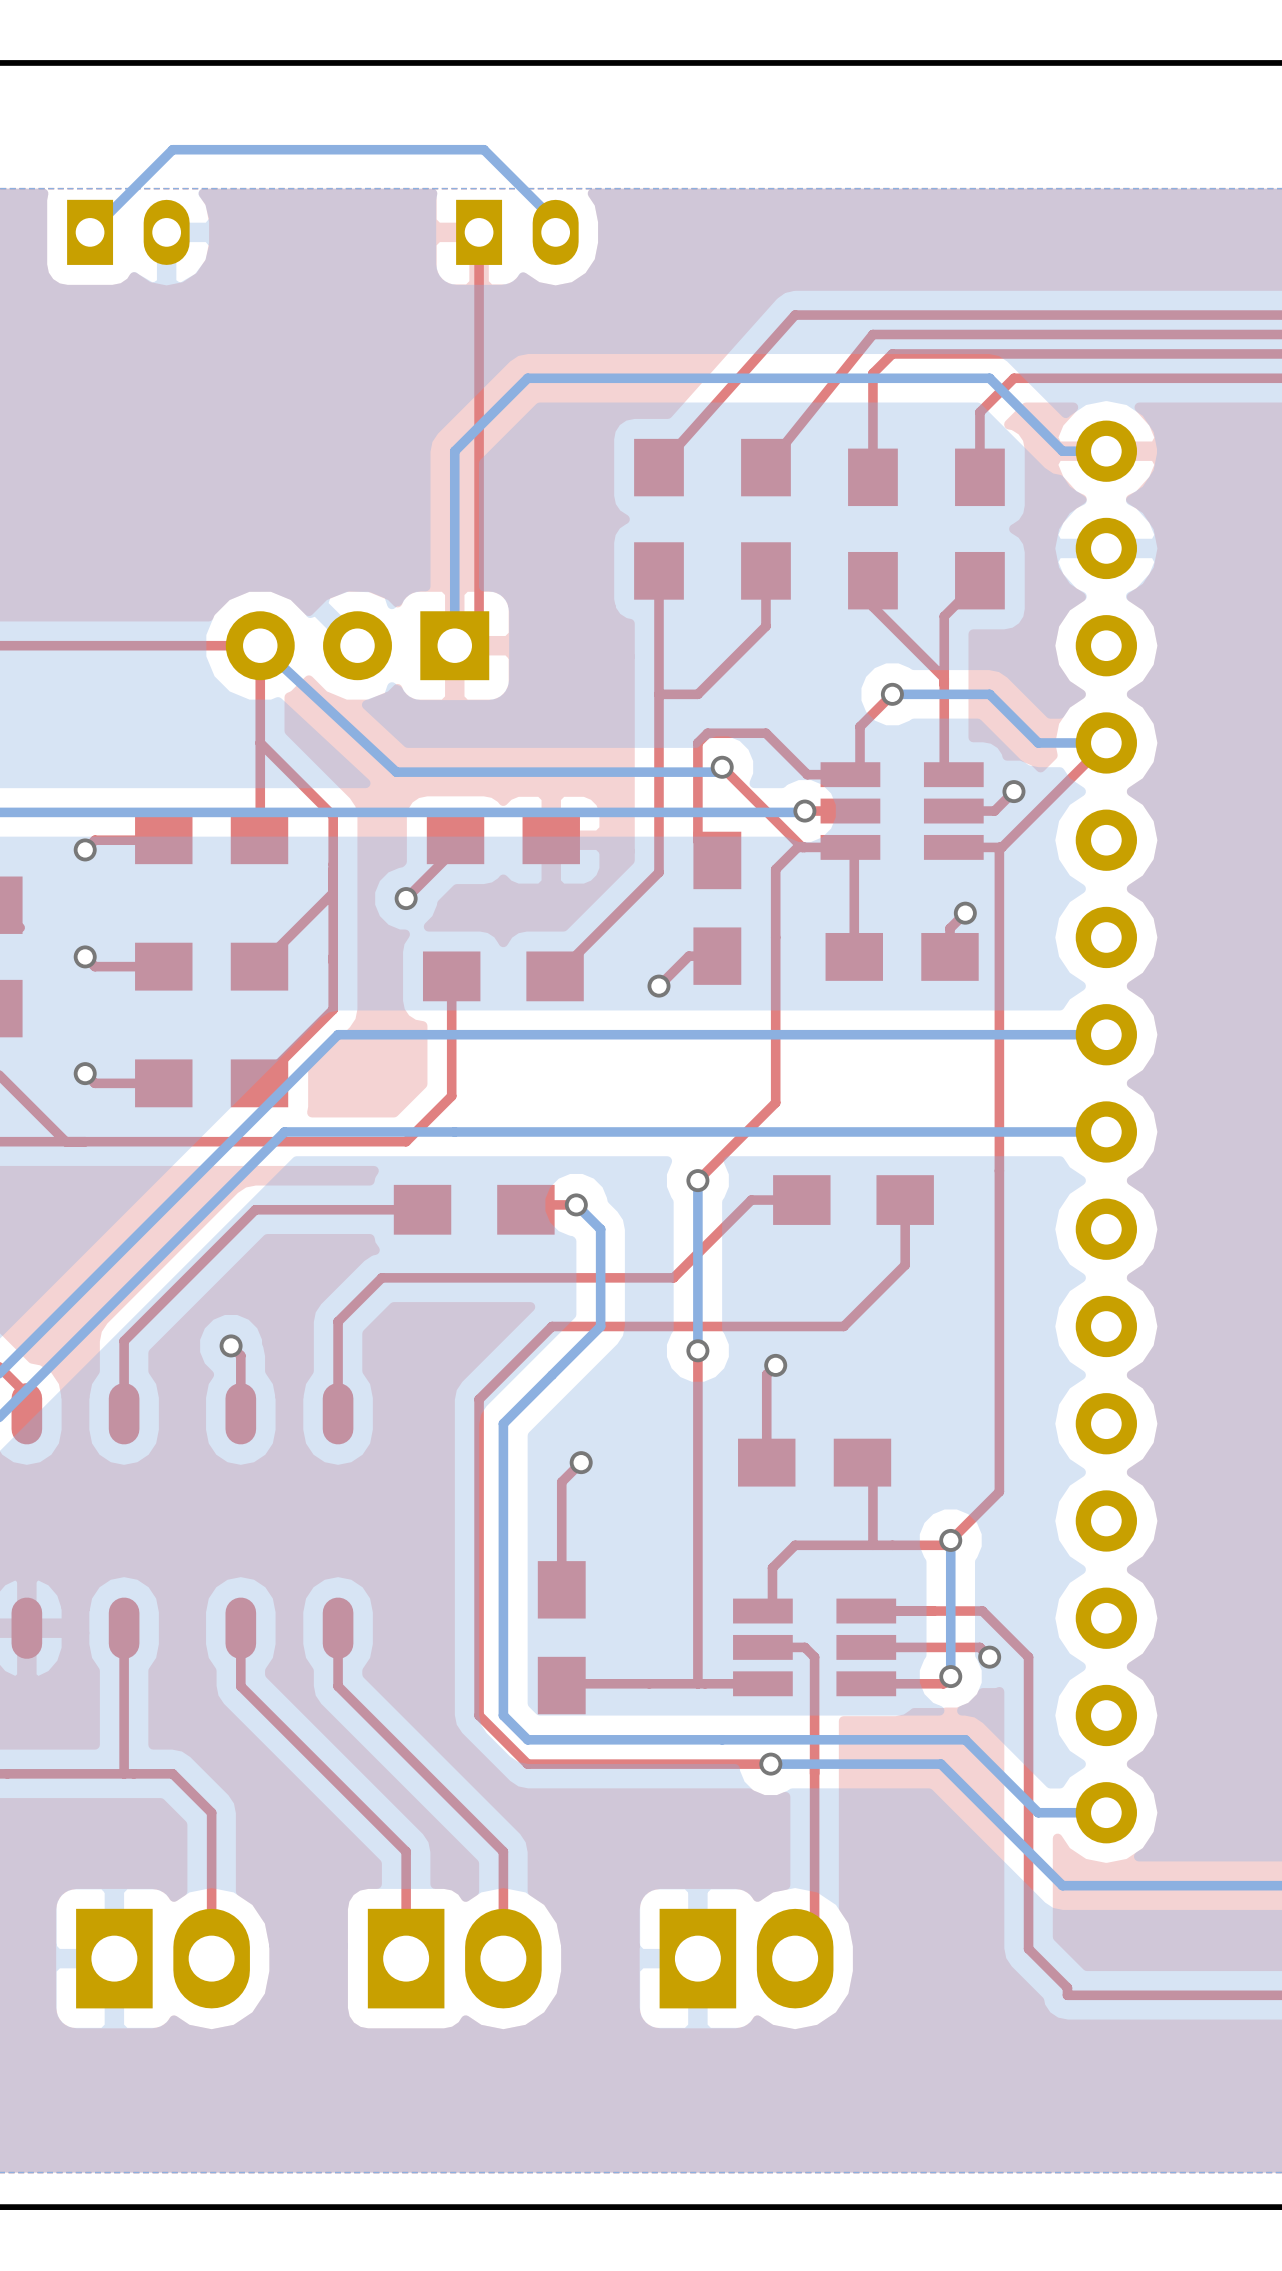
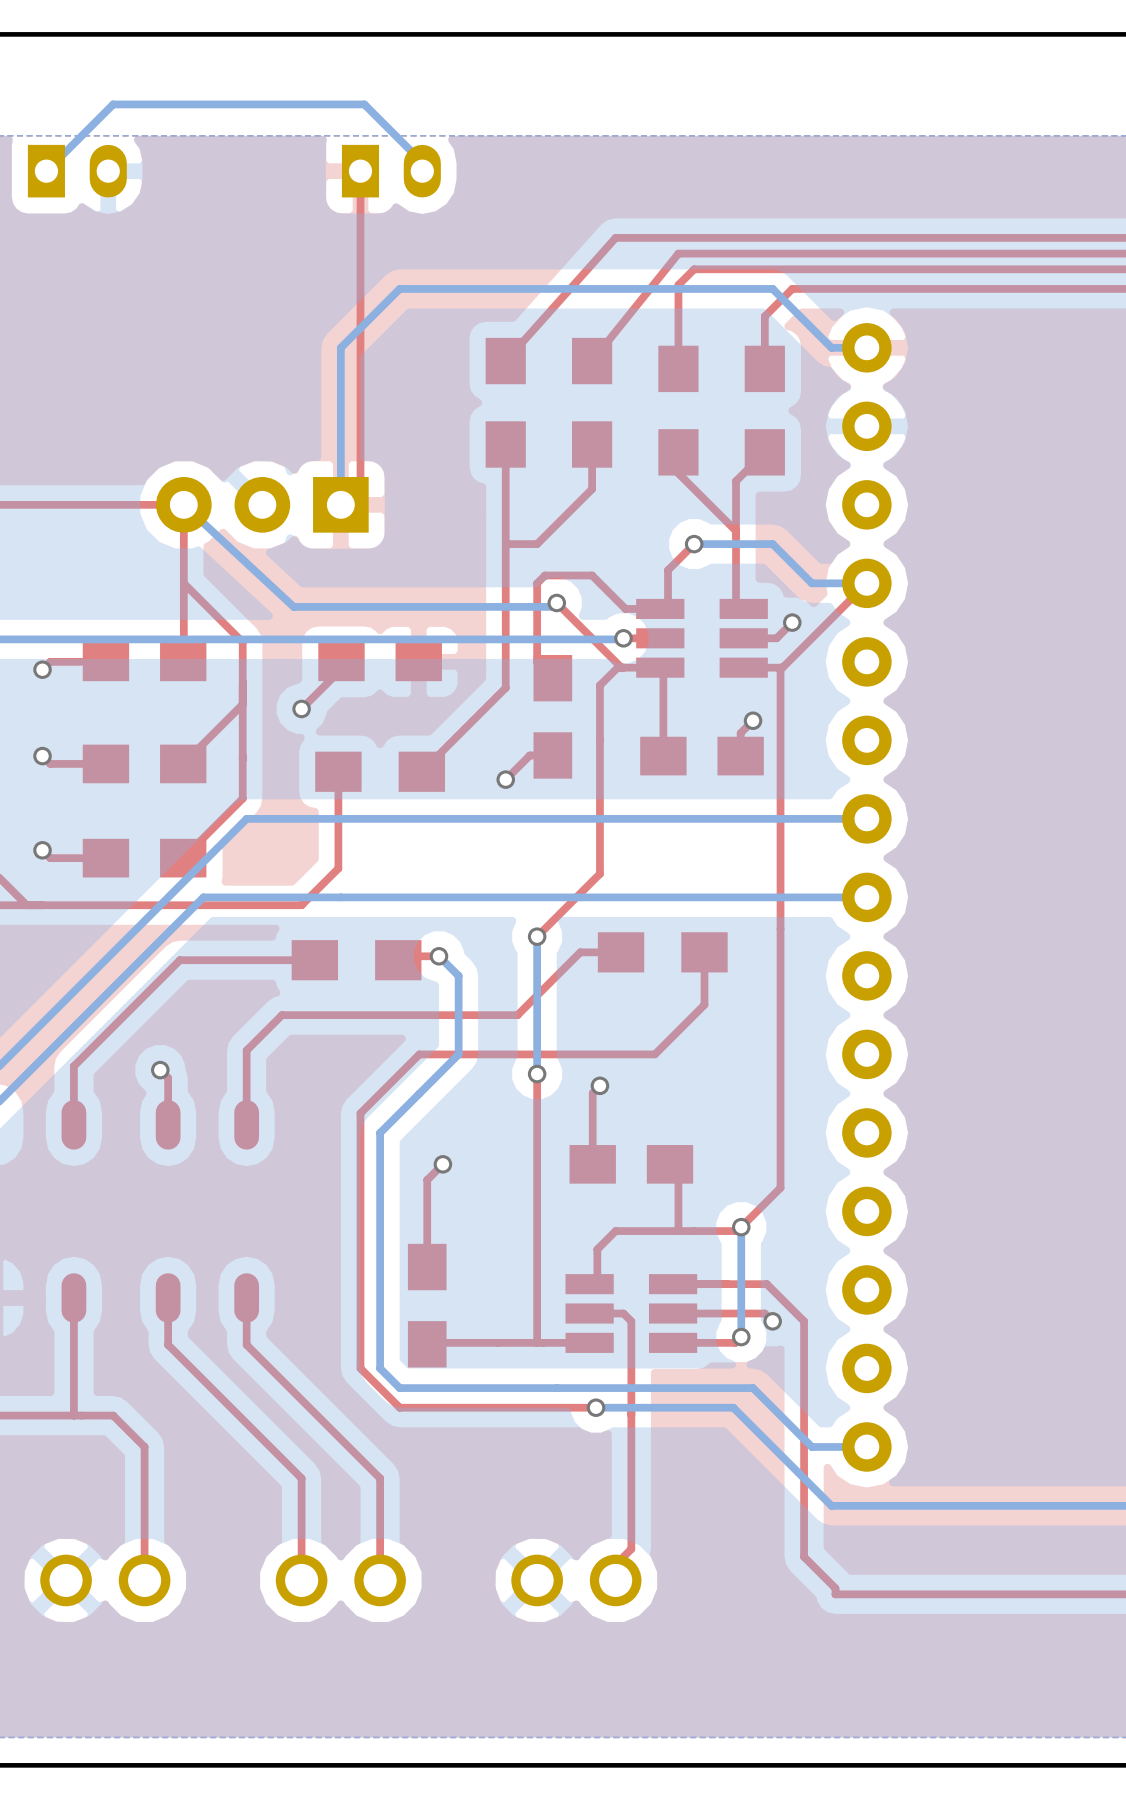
part footprint: [76, 1908, 250, 2009] -> [40, 1554, 171, 1607]
part footprint: [367, 1908, 542, 2009] -> [275, 1554, 406, 1607]
part footprint: [659, 1908, 834, 2009] -> [511, 1554, 642, 1607]

